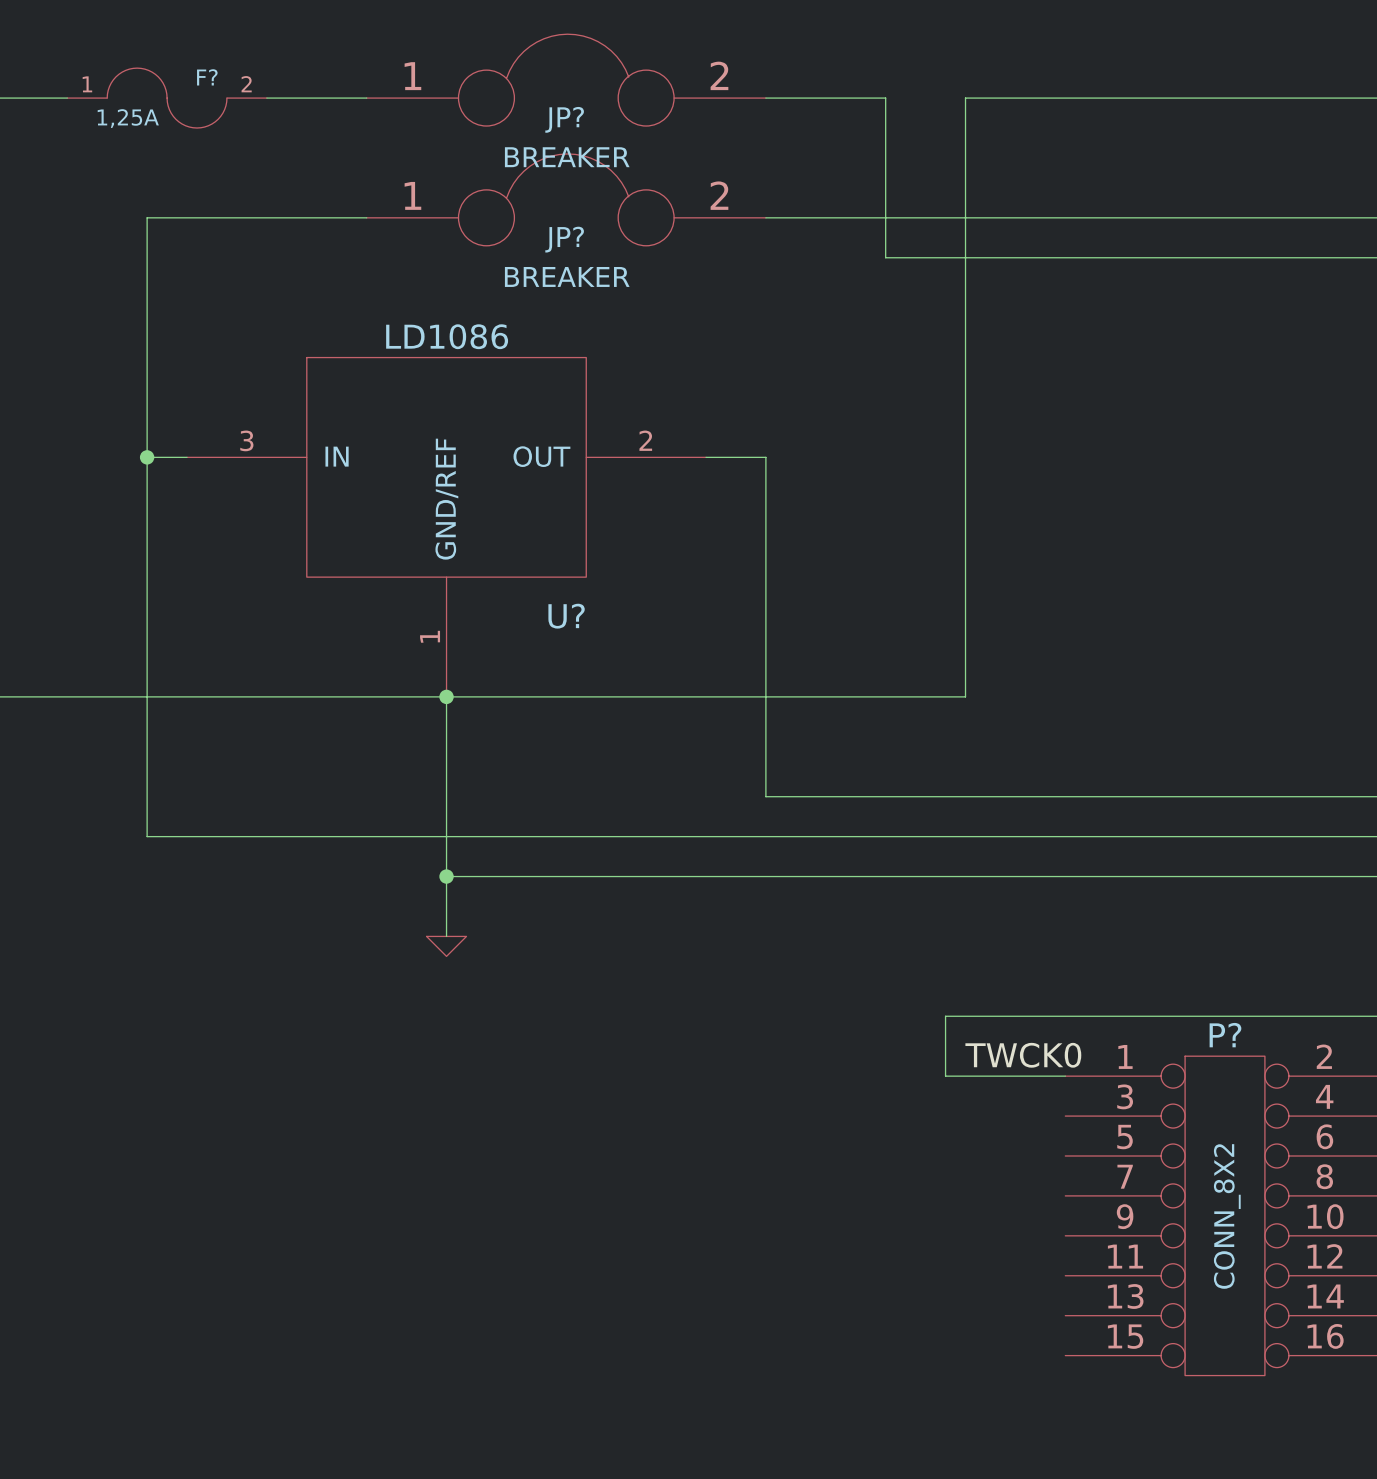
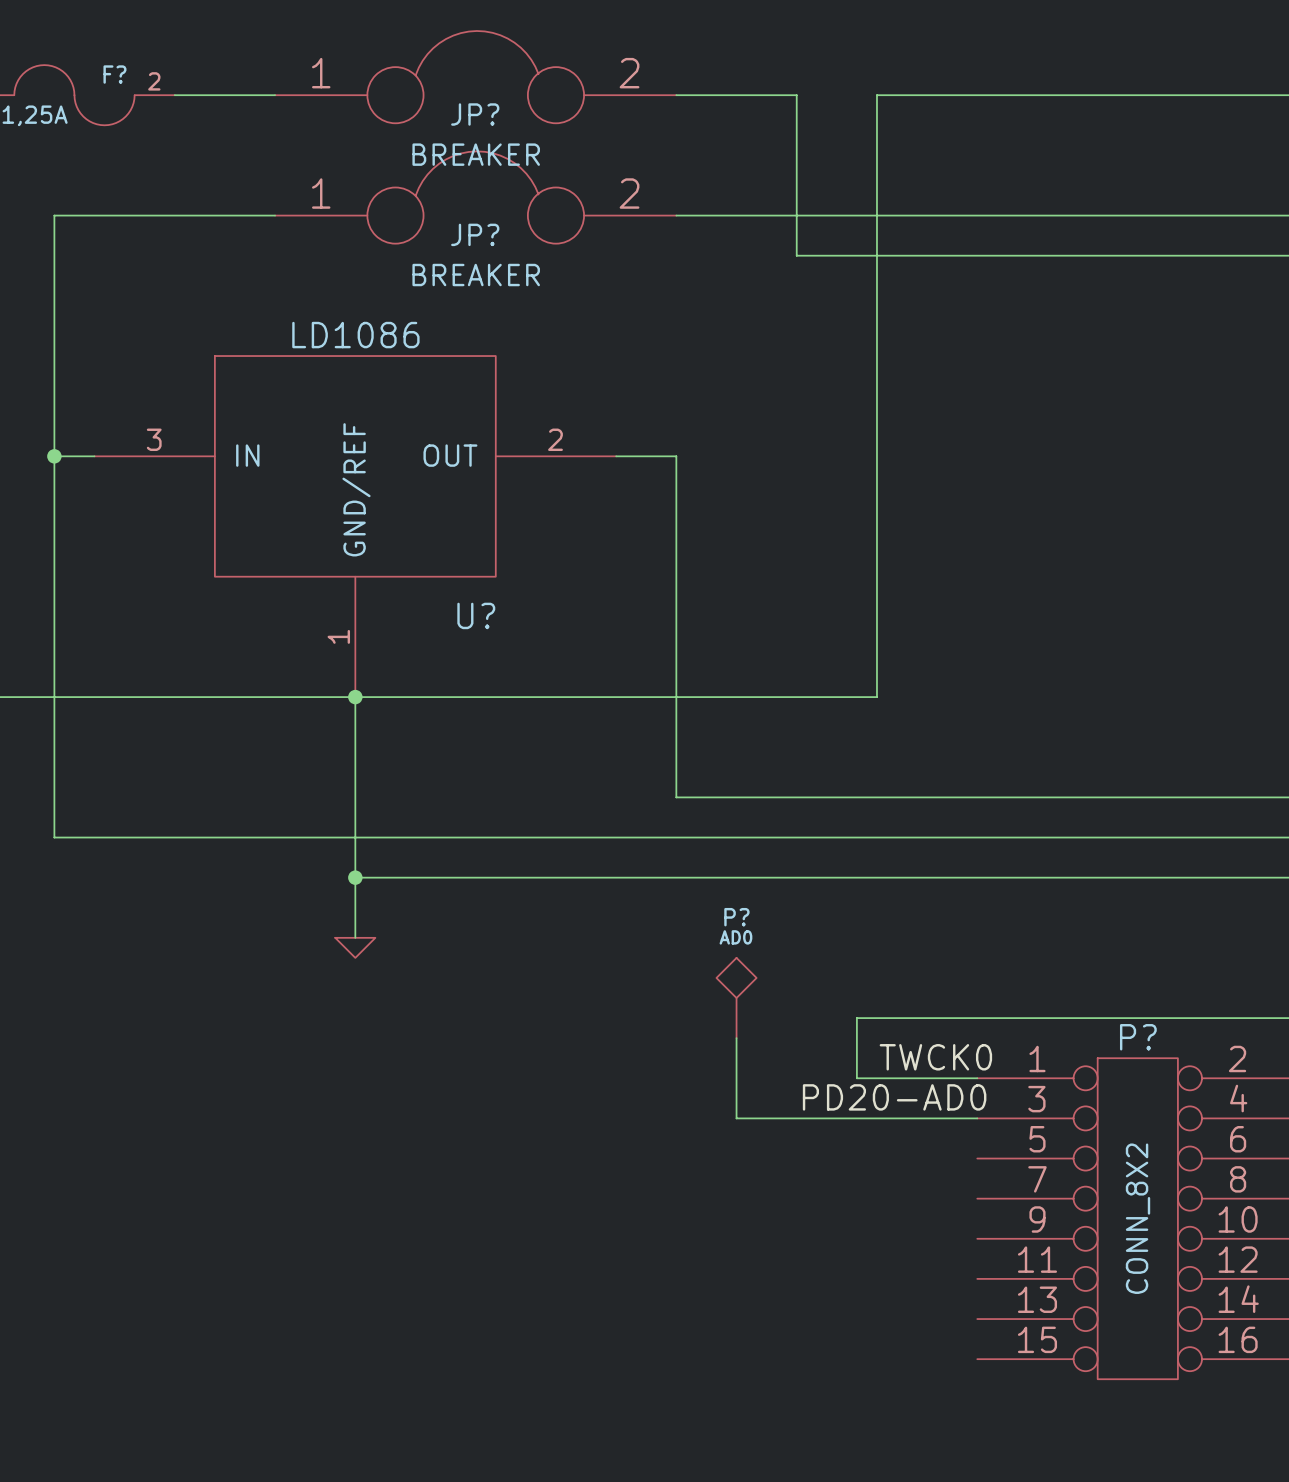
P?: none -> AD0 (736, 998)
wire: none -> (736, 1038) (736, 1118) (977, 1118)
label: none -> PD20-AD0 (894, 1097)

